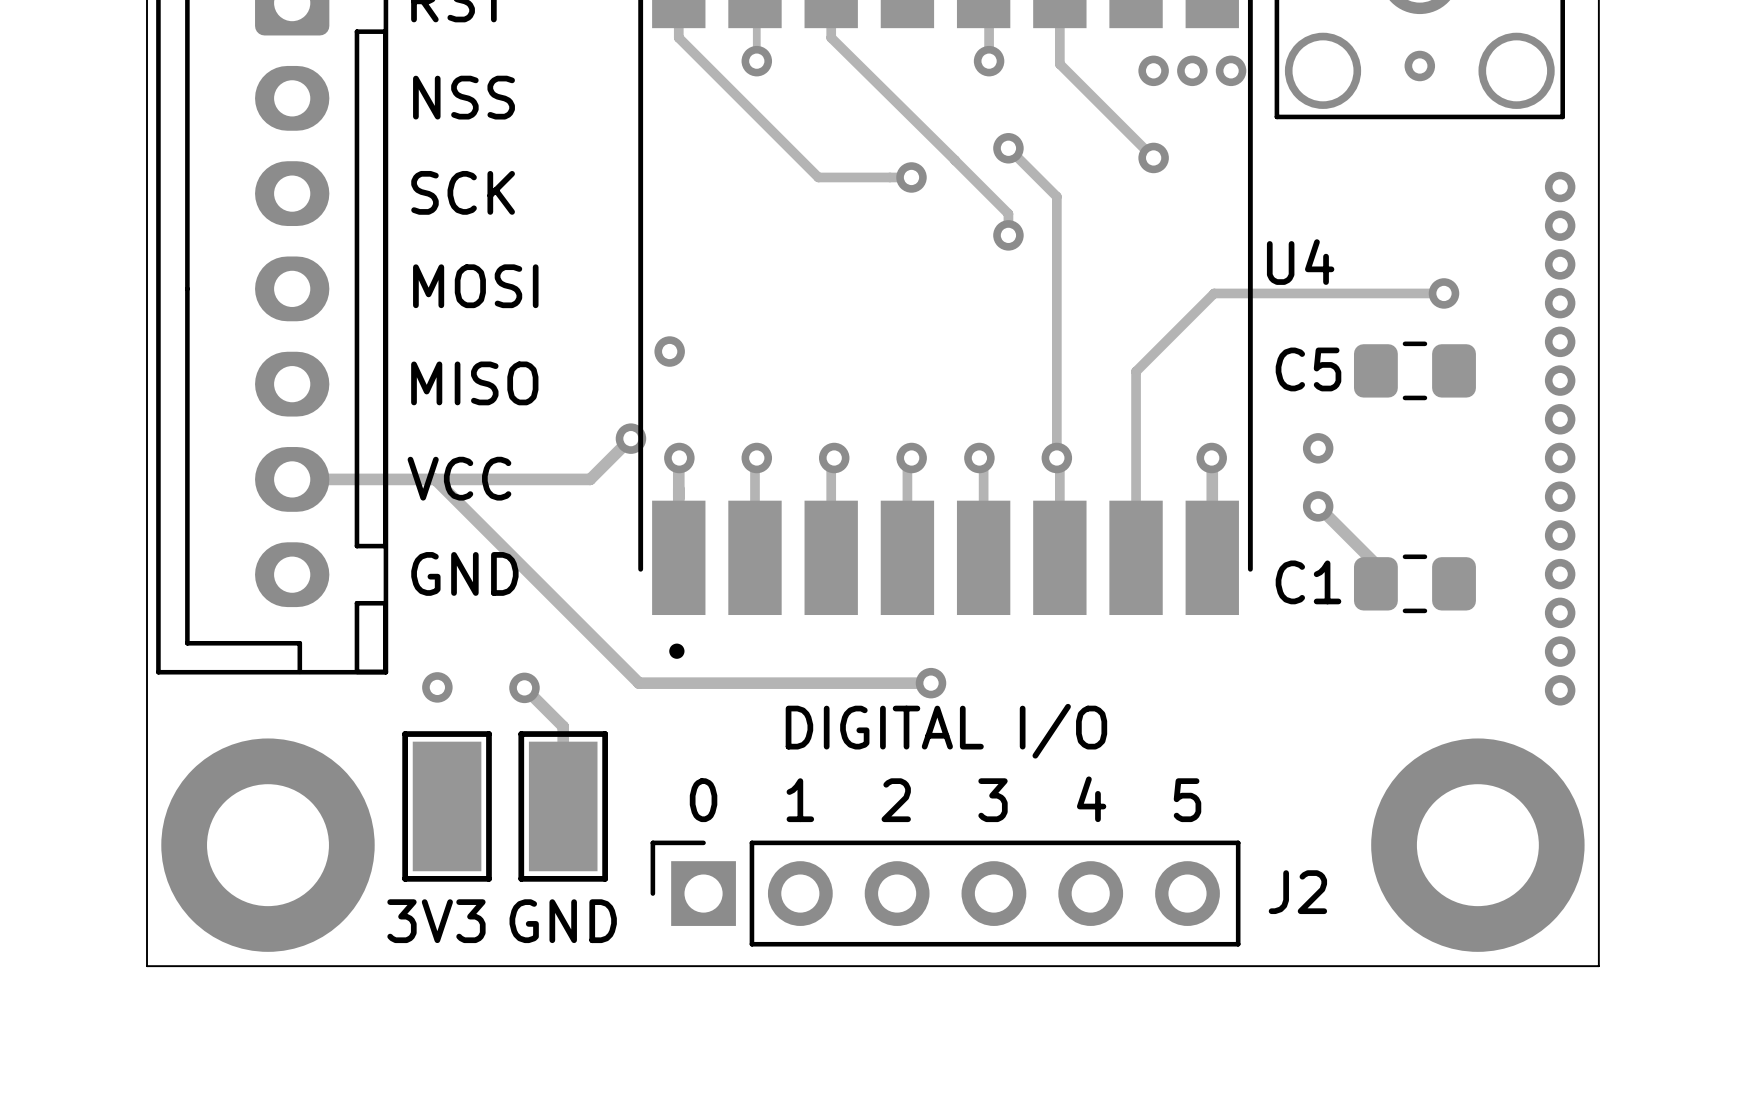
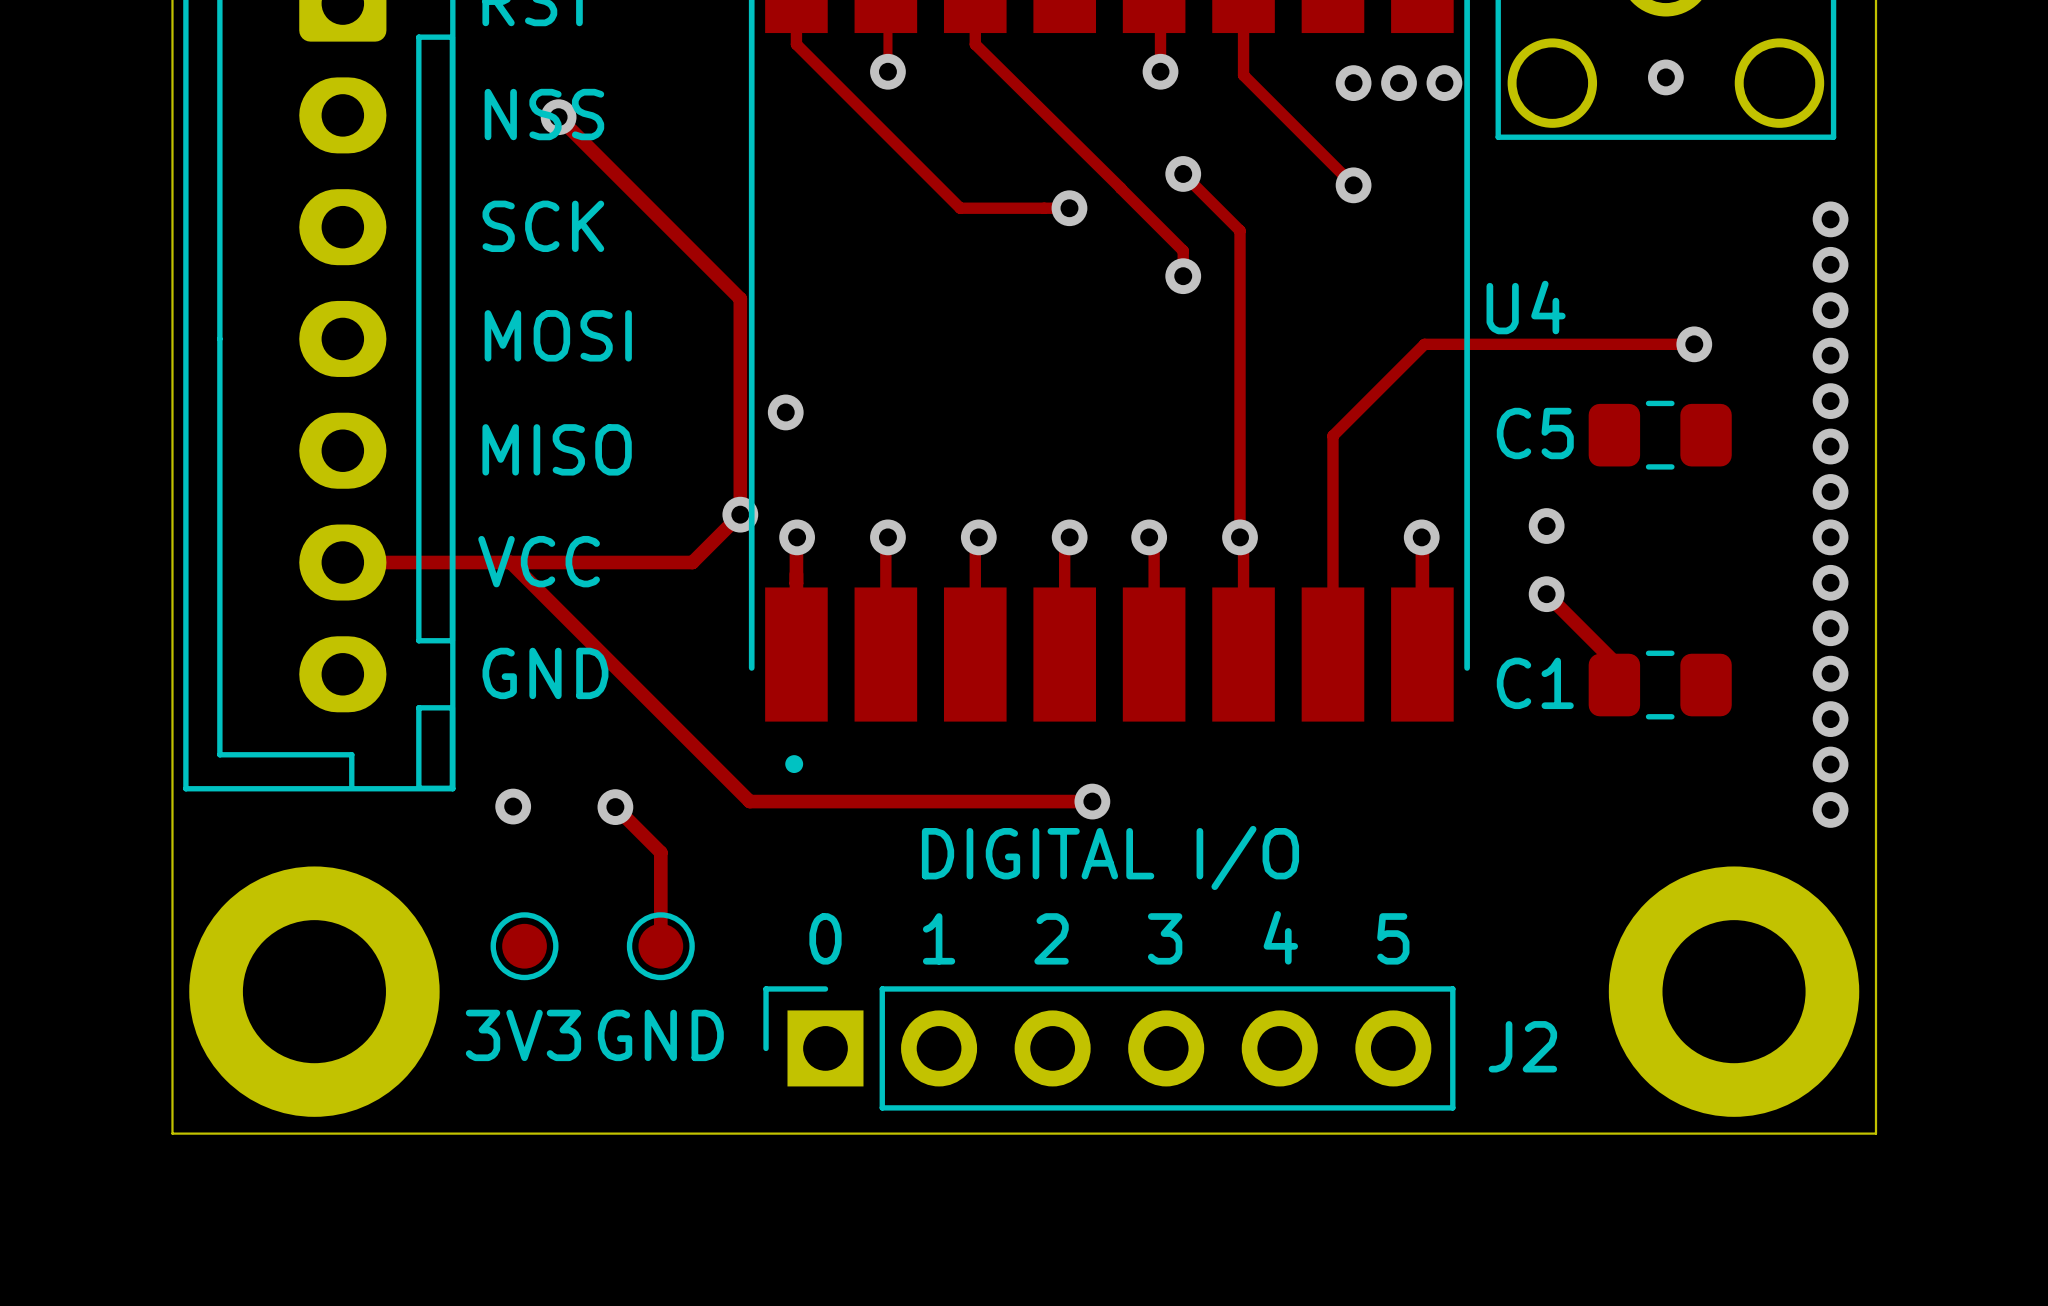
track: none -> (558, 117) (740, 298) (740, 514)
via: none -> (558, 117)
part footprint: [402, 731, 492, 882] -> [490, 912, 559, 981]
part footprint: [518, 731, 608, 882] -> [626, 912, 695, 981]
text position: 3V3 (436, 921) -> 3V3 (523, 1035)
text position: GND (563, 921) -> GND (660, 1035)

